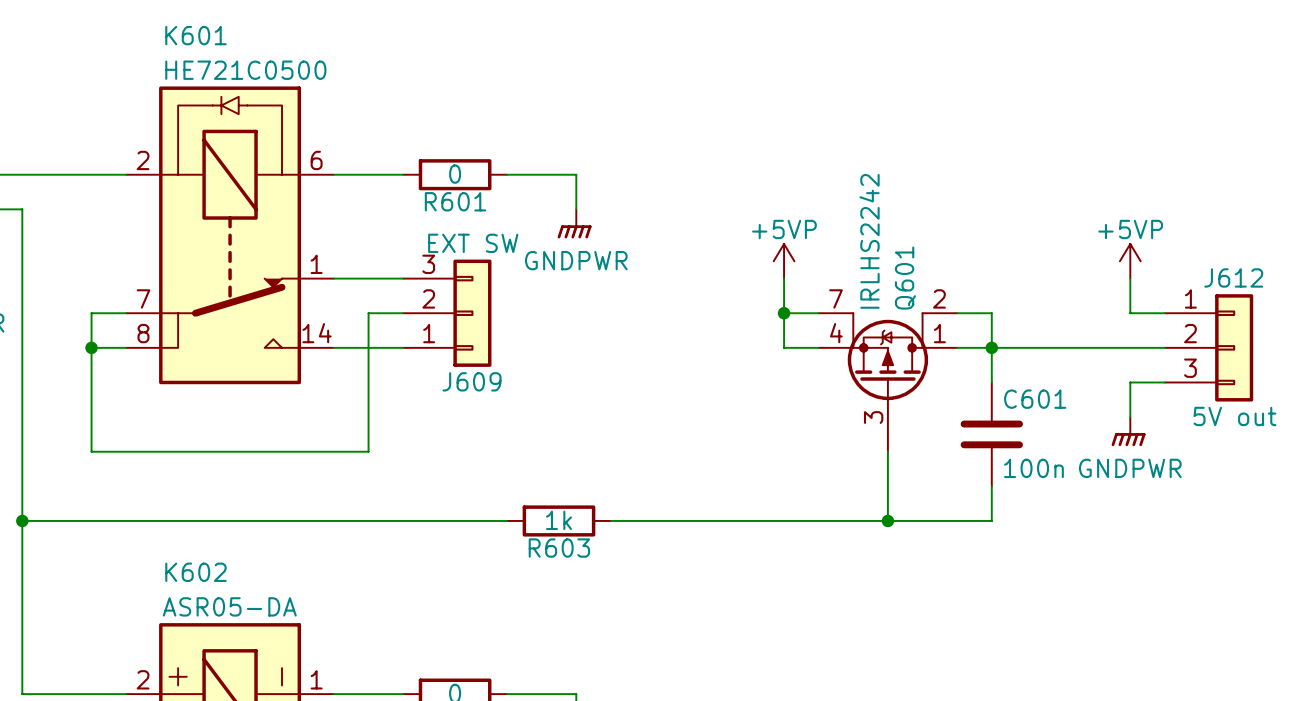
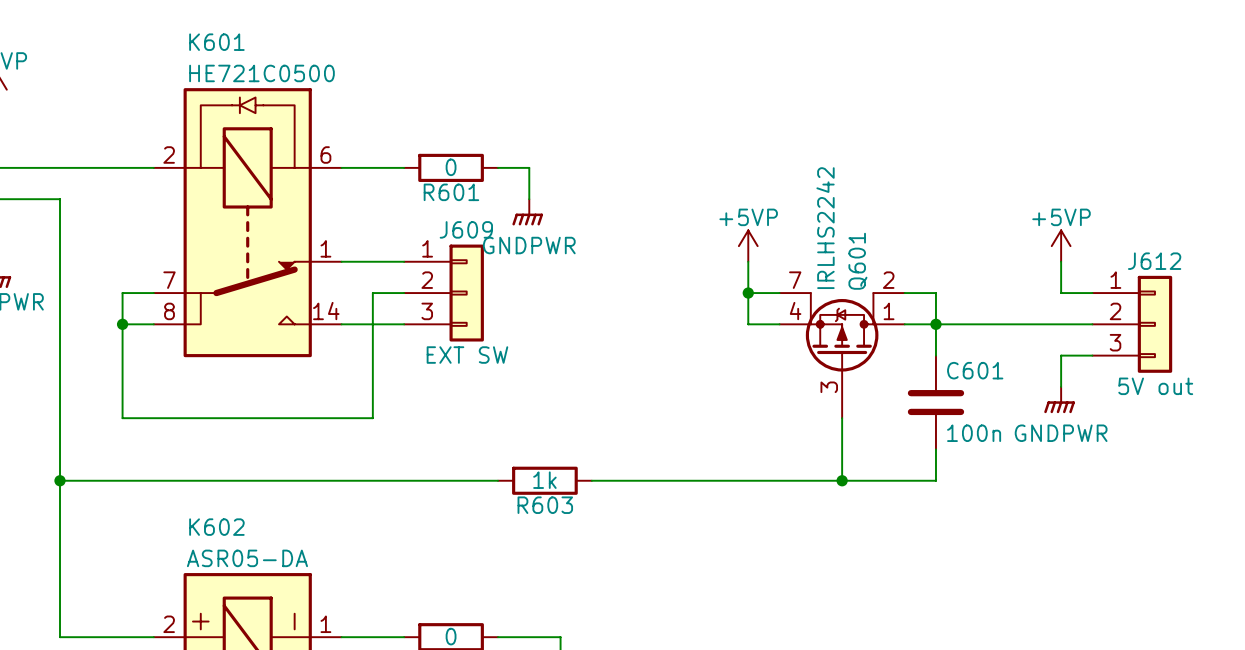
wire: (541, 174) (576, 174) (576, 209) -> (529, 167) (529, 199)
power symbol position: GNDPWR (574, 223) -> GNDPWR (527, 212)
J609 flip: as is (472, 313) -> up-down (466, 293)

